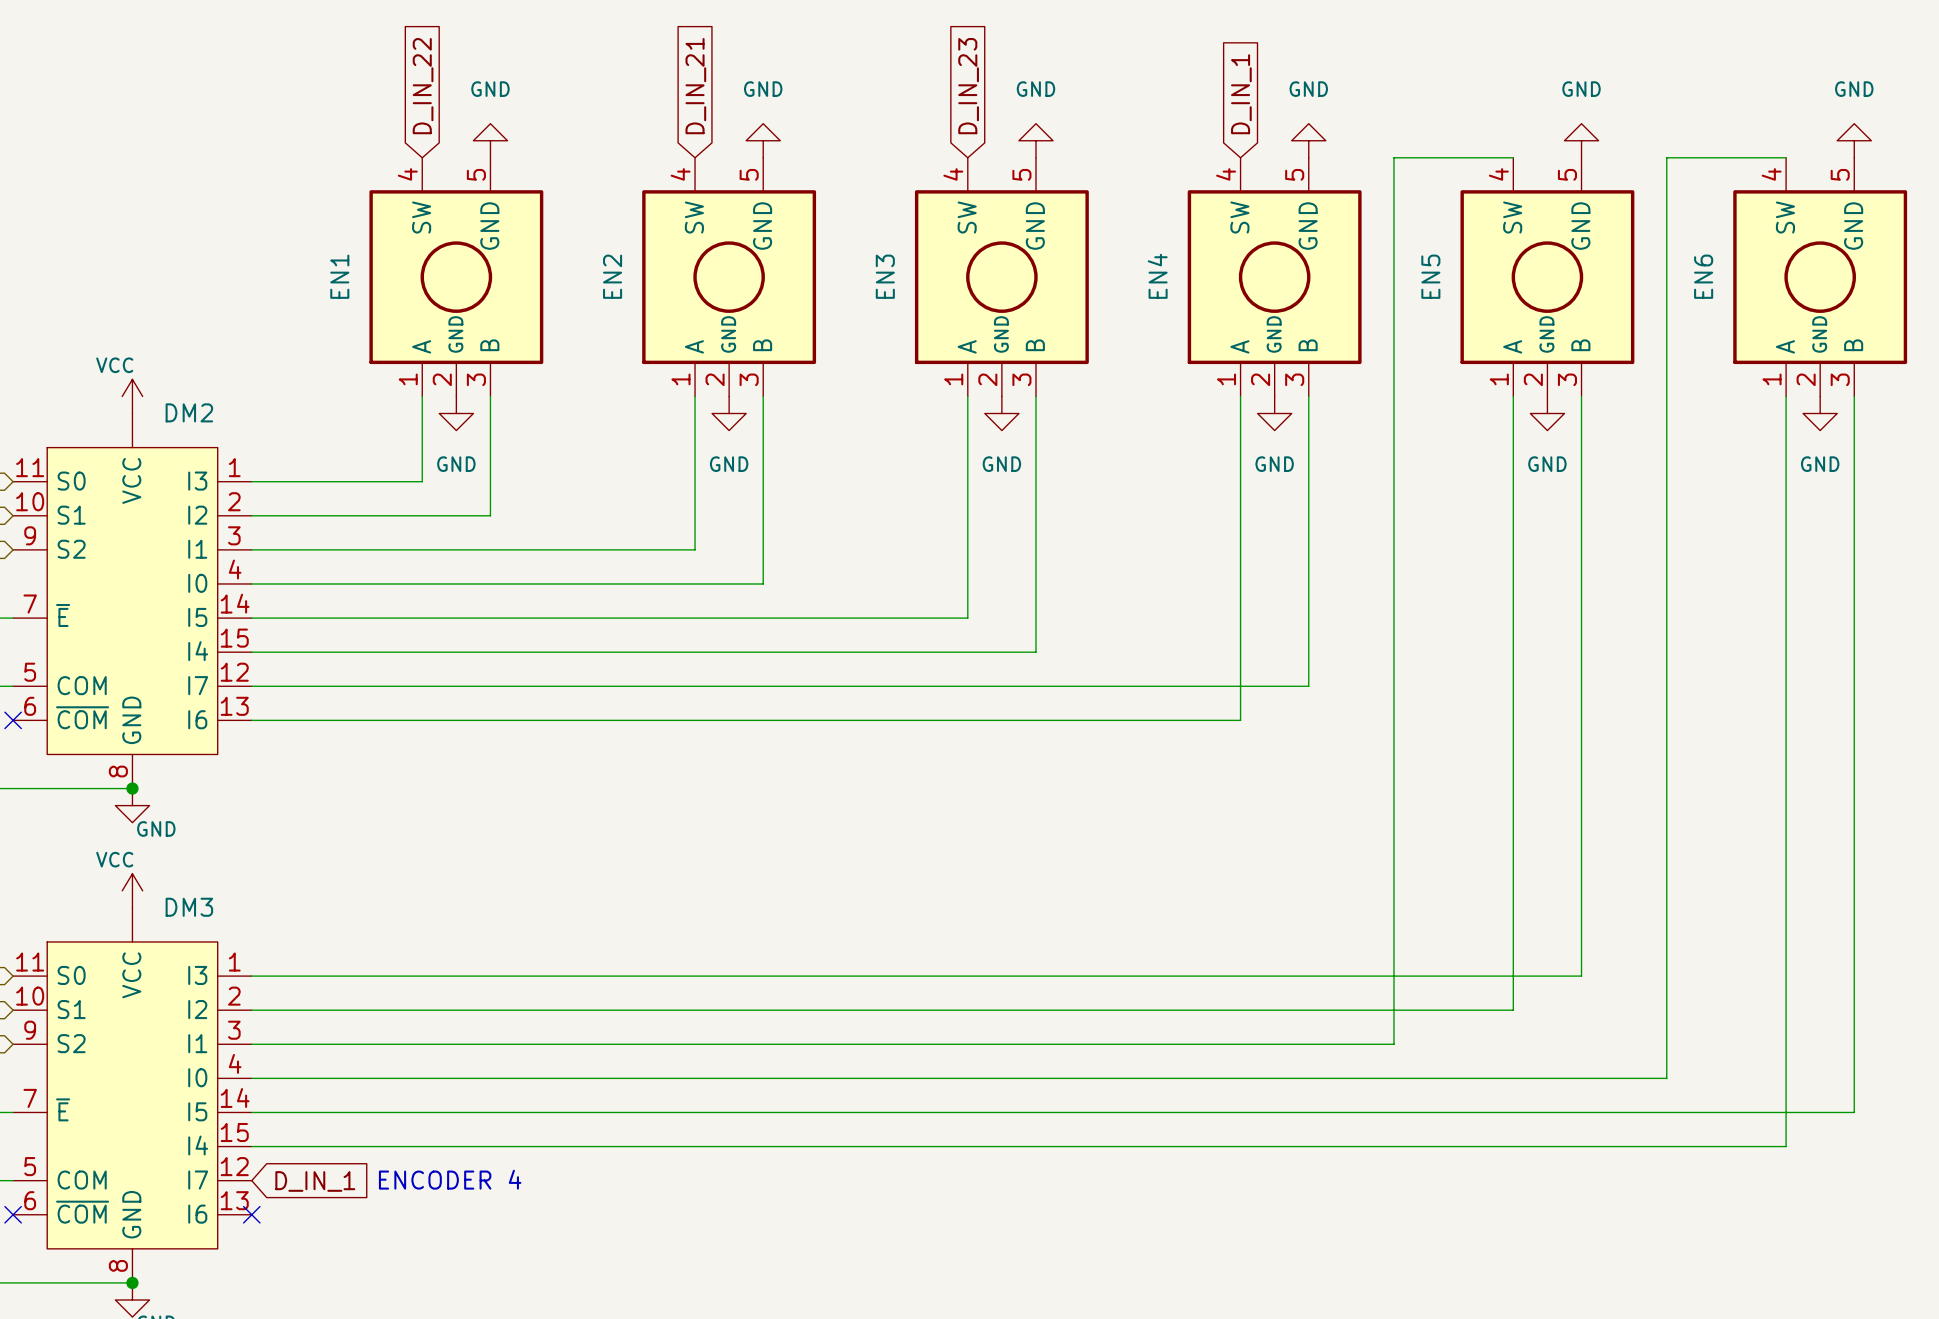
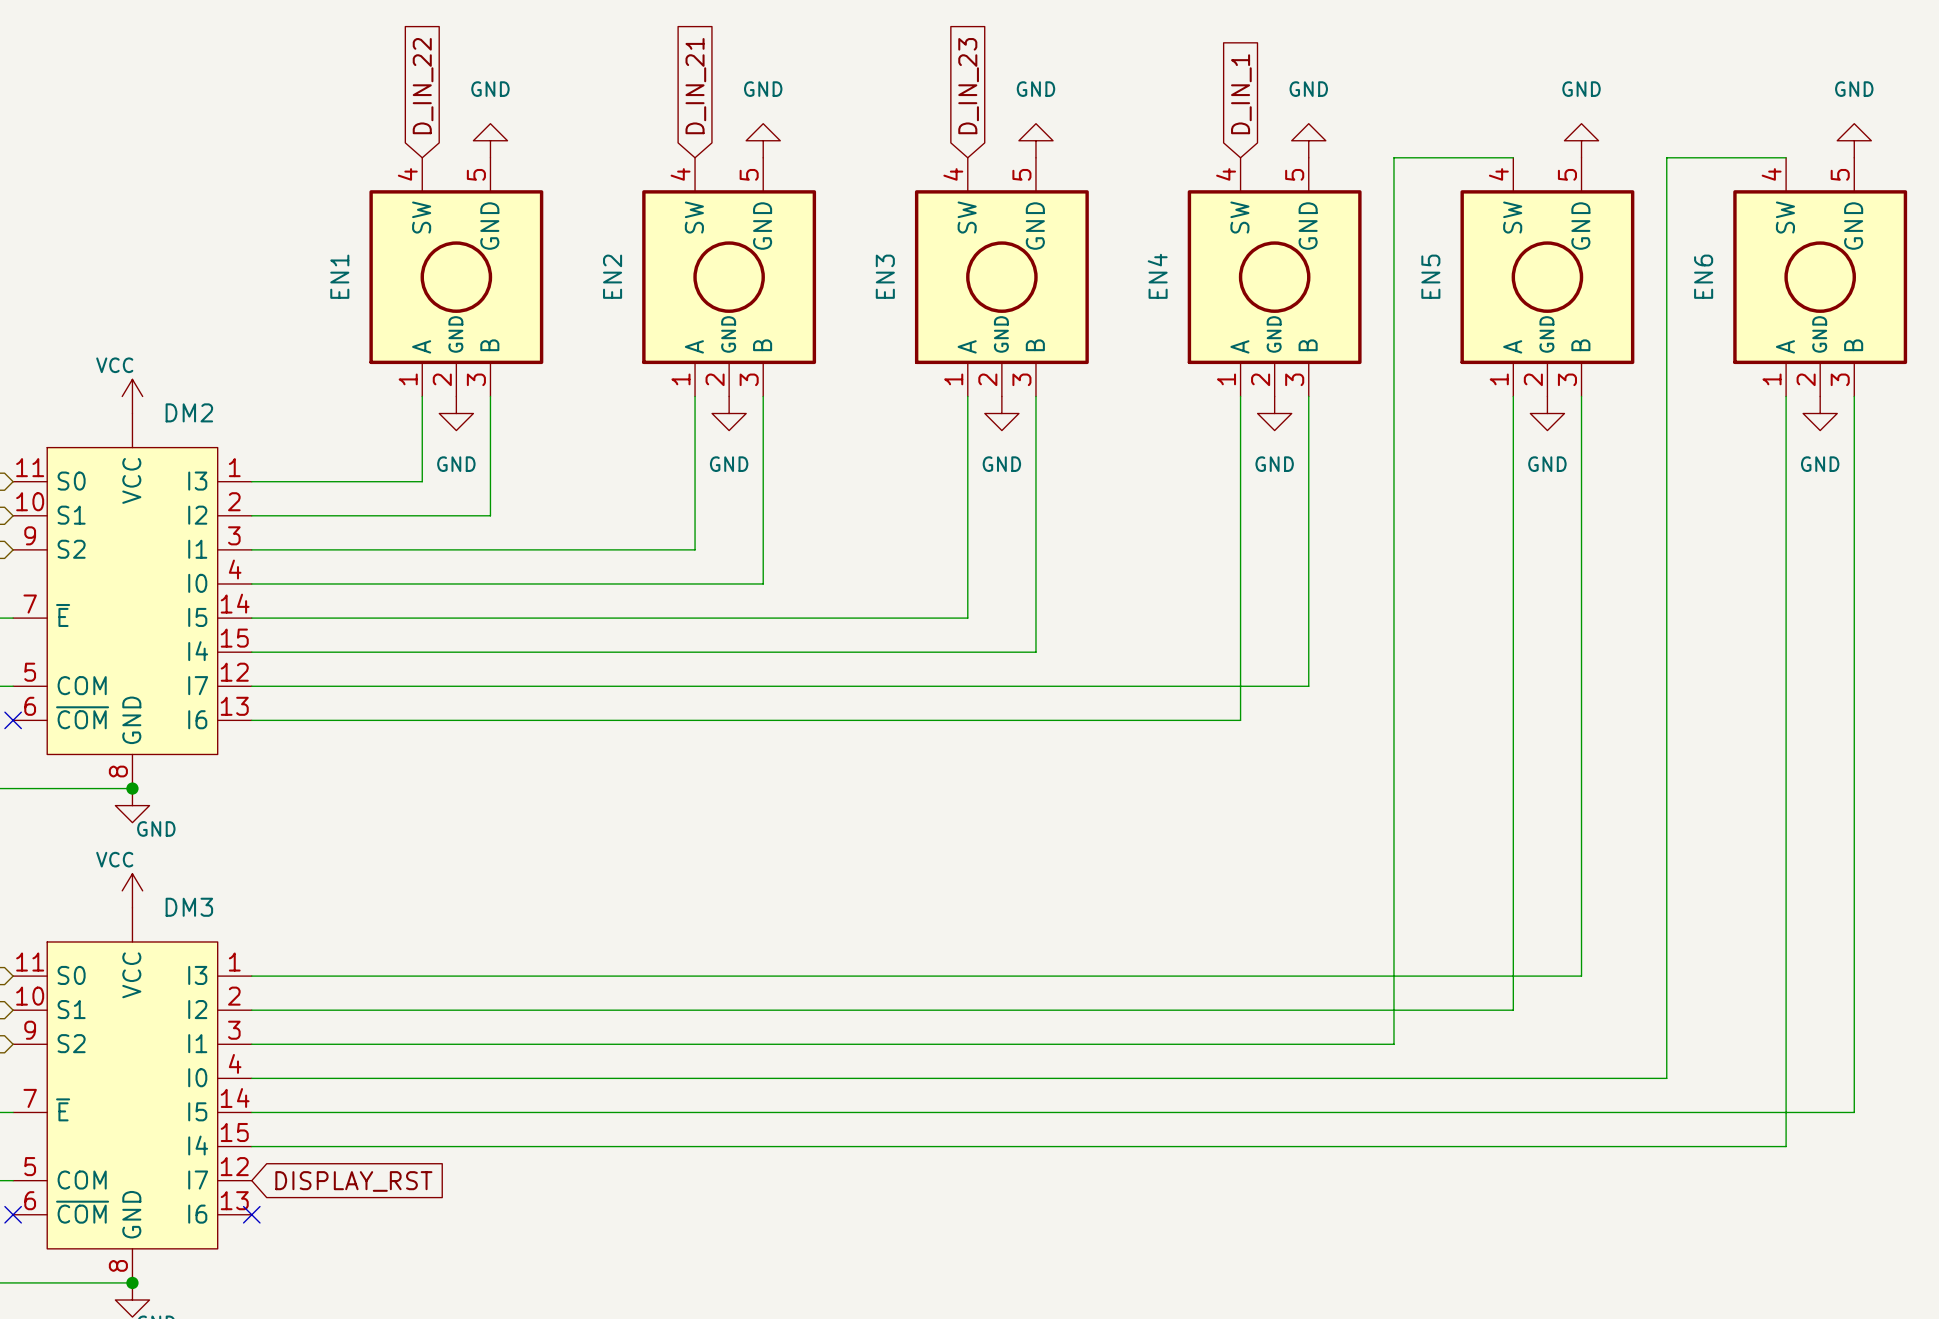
text: ENCODER 4 (450, 1179) -> none
global label: D_IN_1 (315, 1181) -> DISPLAY_RST (353, 1181)

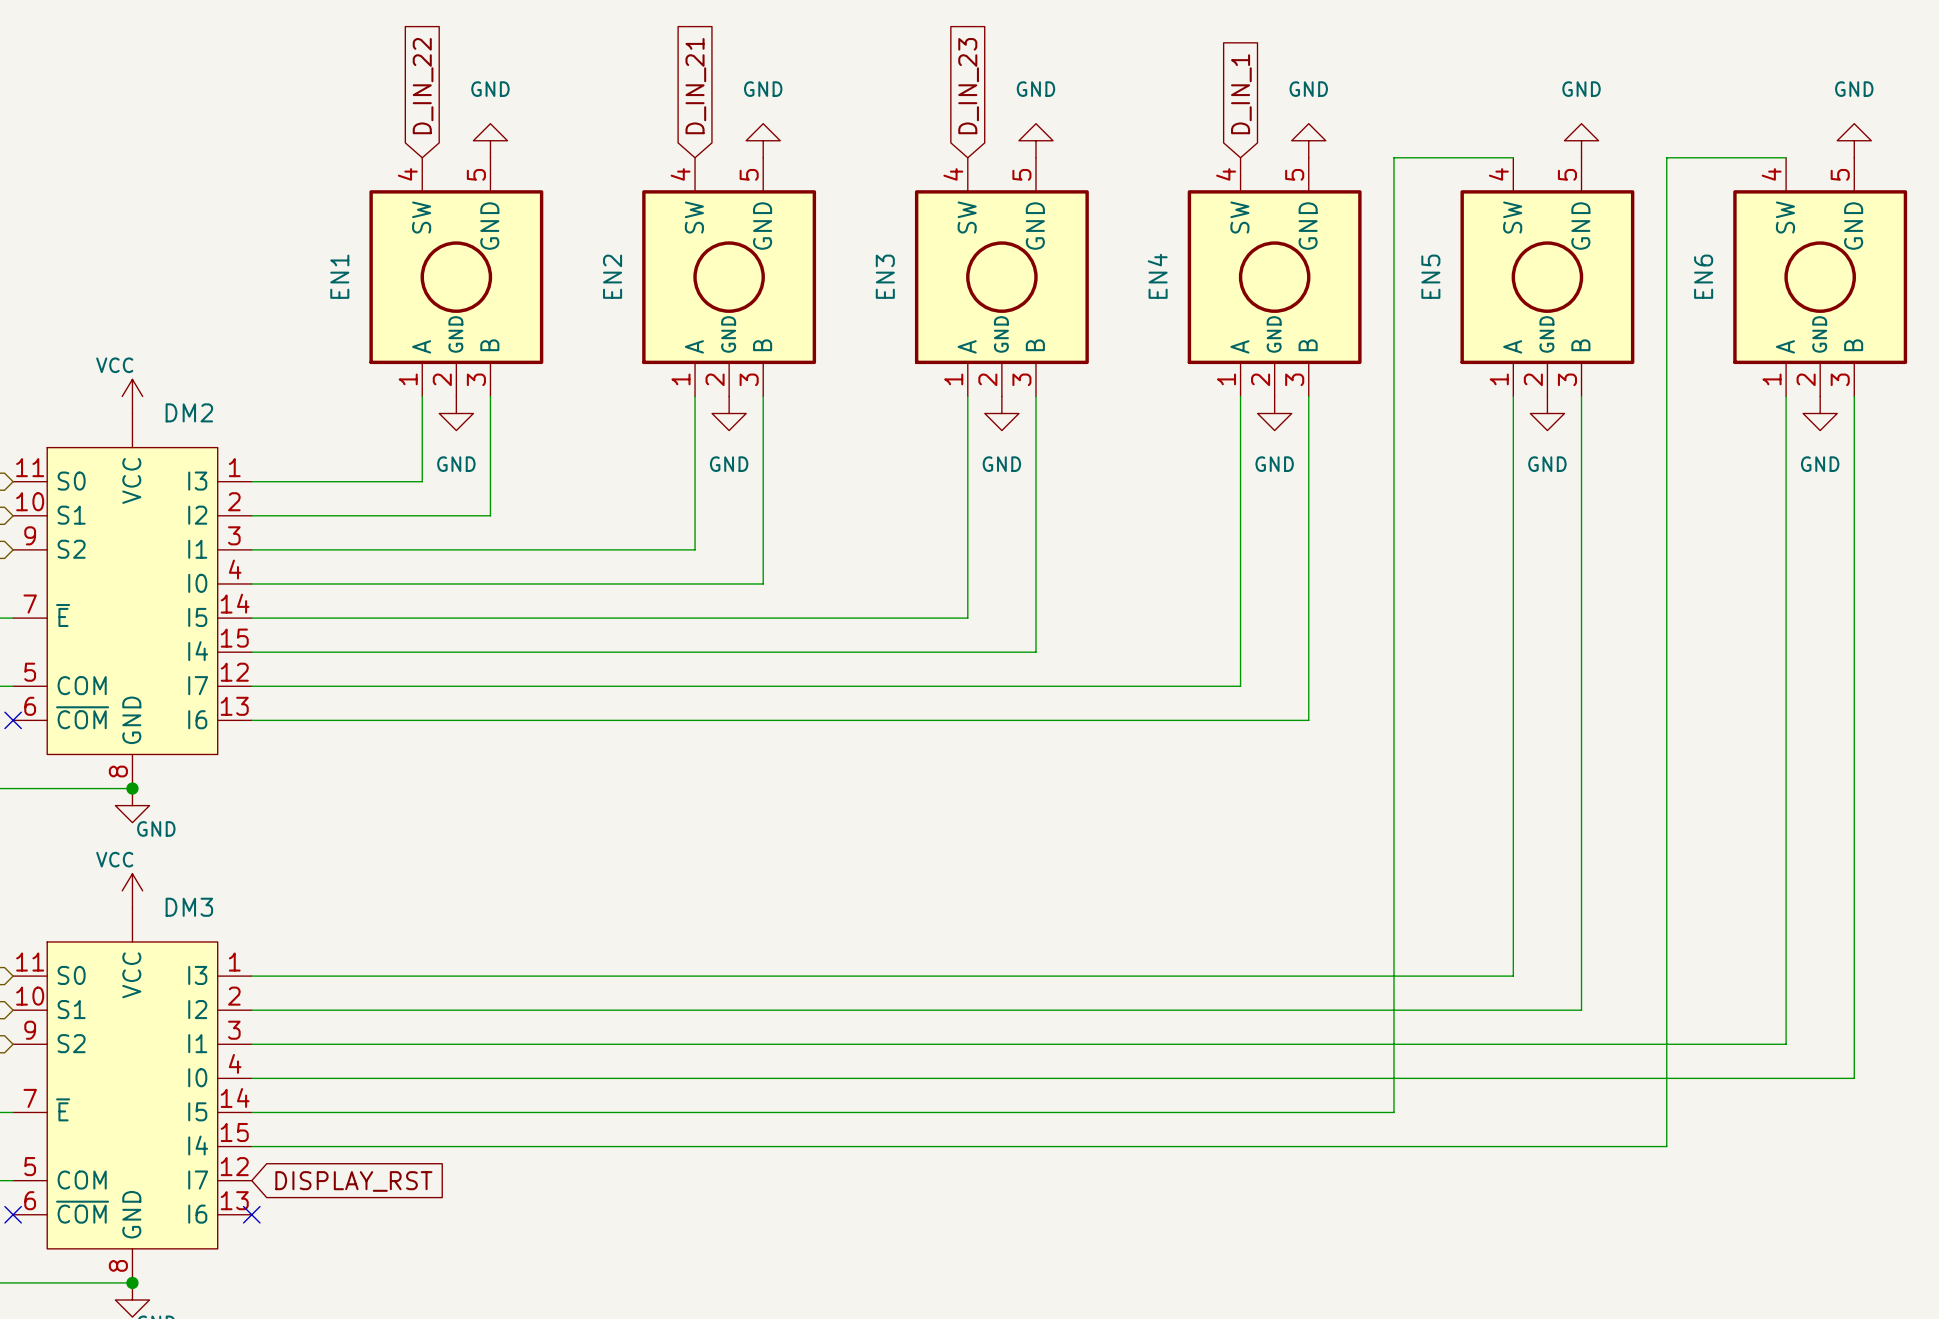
wire: (1308, 686) (1240, 686) (1240, 720) -> (1308, 686) (1308, 720) (1240, 720)
wire: (1581, 976) (1513, 976) (1513, 1010) -> (1581, 976) (1581, 1010) (1513, 1010)
wire: (1786, 1044) (1786, 1146) (1666, 1146) -> (1854, 1078) (1666, 1078) (1666, 1146)
wire: (1854, 1078) (1854, 1112) (1393, 1112) -> (1786, 1044) (1393, 1044) (1393, 1112)

